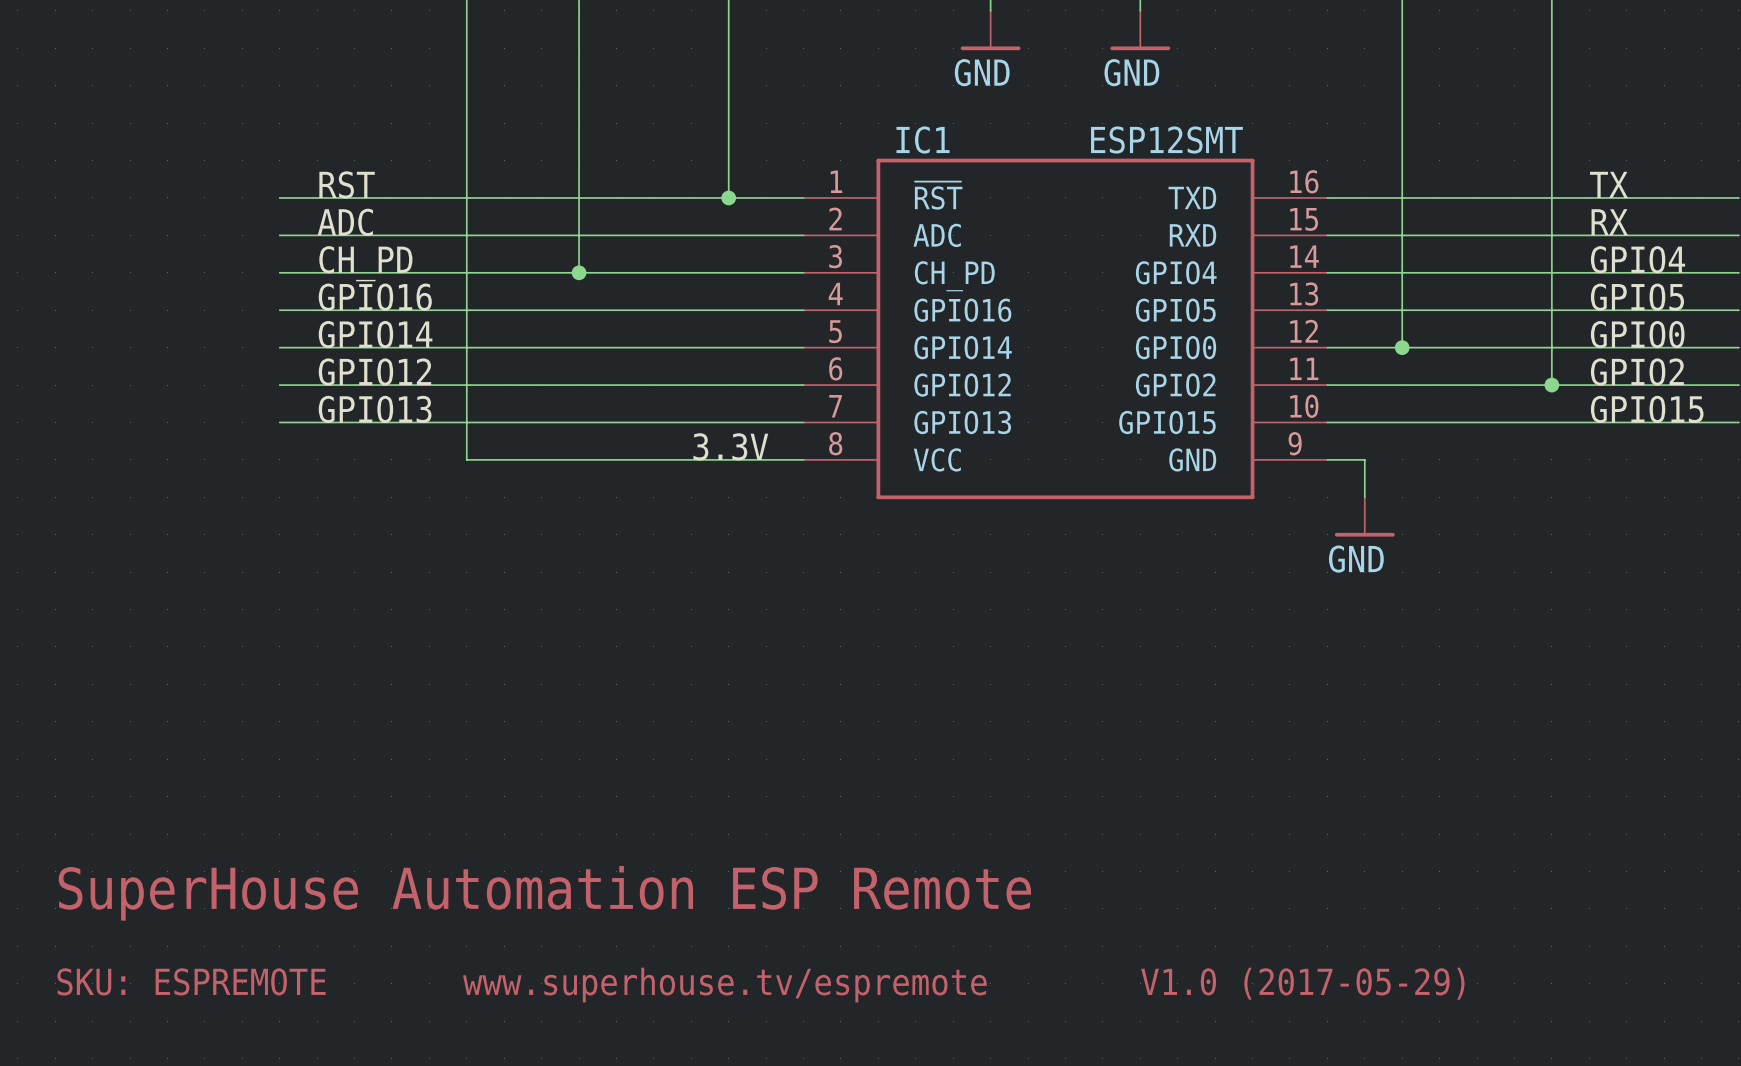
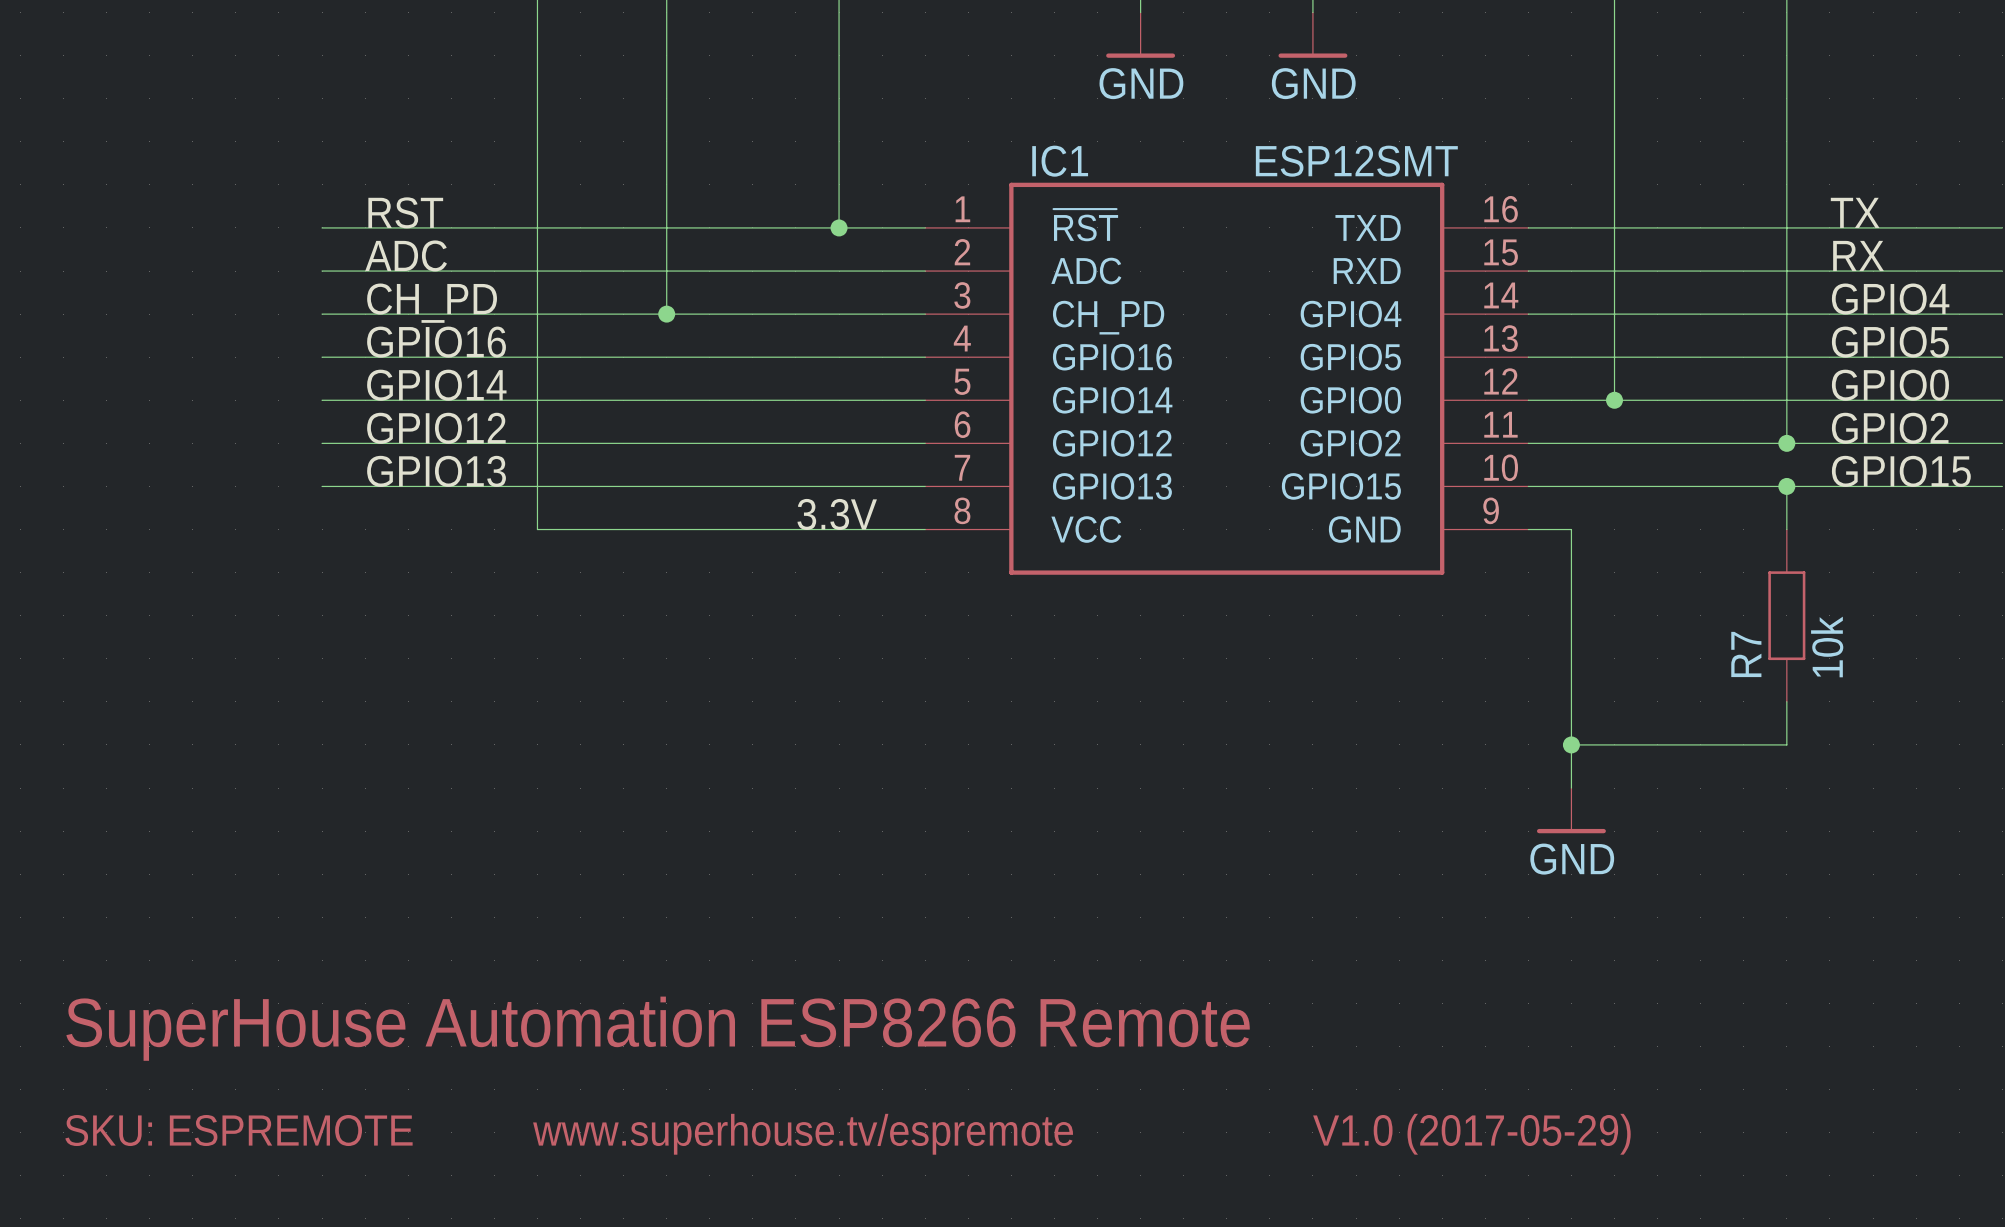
wire: none -> (1786, 486) (1786, 529)
junction: none -> (1786, 486)
wire: none -> (1571, 572) (1571, 788)
power symbol position: GND (1364, 516) -> GND (1571, 810)
R7: none -> 10k (1786, 615)
wire: none -> (1786, 701) (1786, 744) (1571, 744)
junction: none -> (1571, 744)
text: SuperHouse Automation ESP Remote (544, 893) -> SuperHouse Automation ESP8266 Remote (658, 1028)

